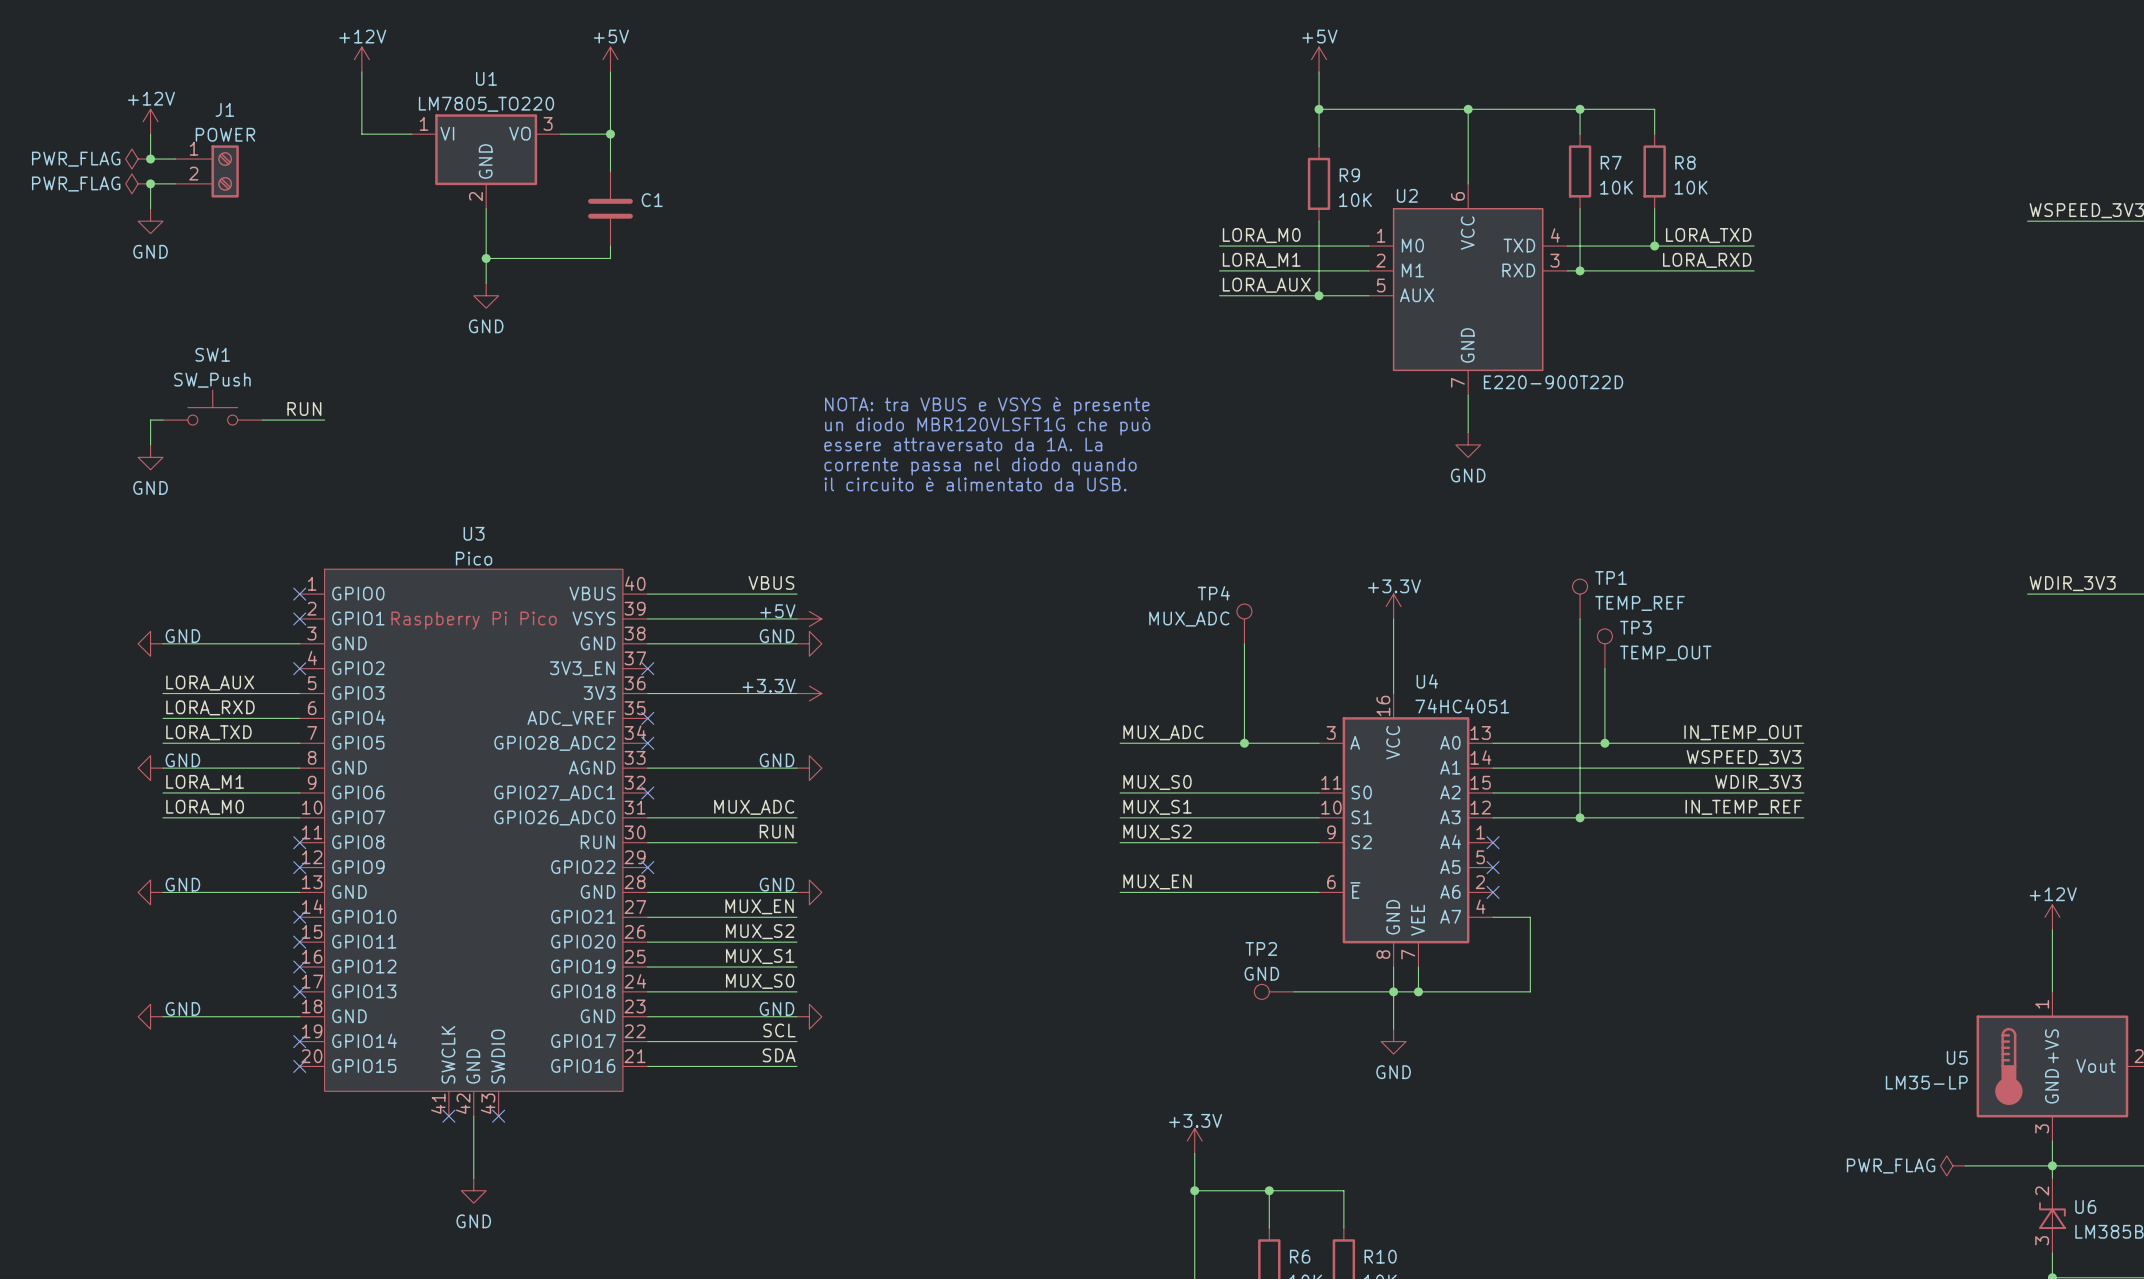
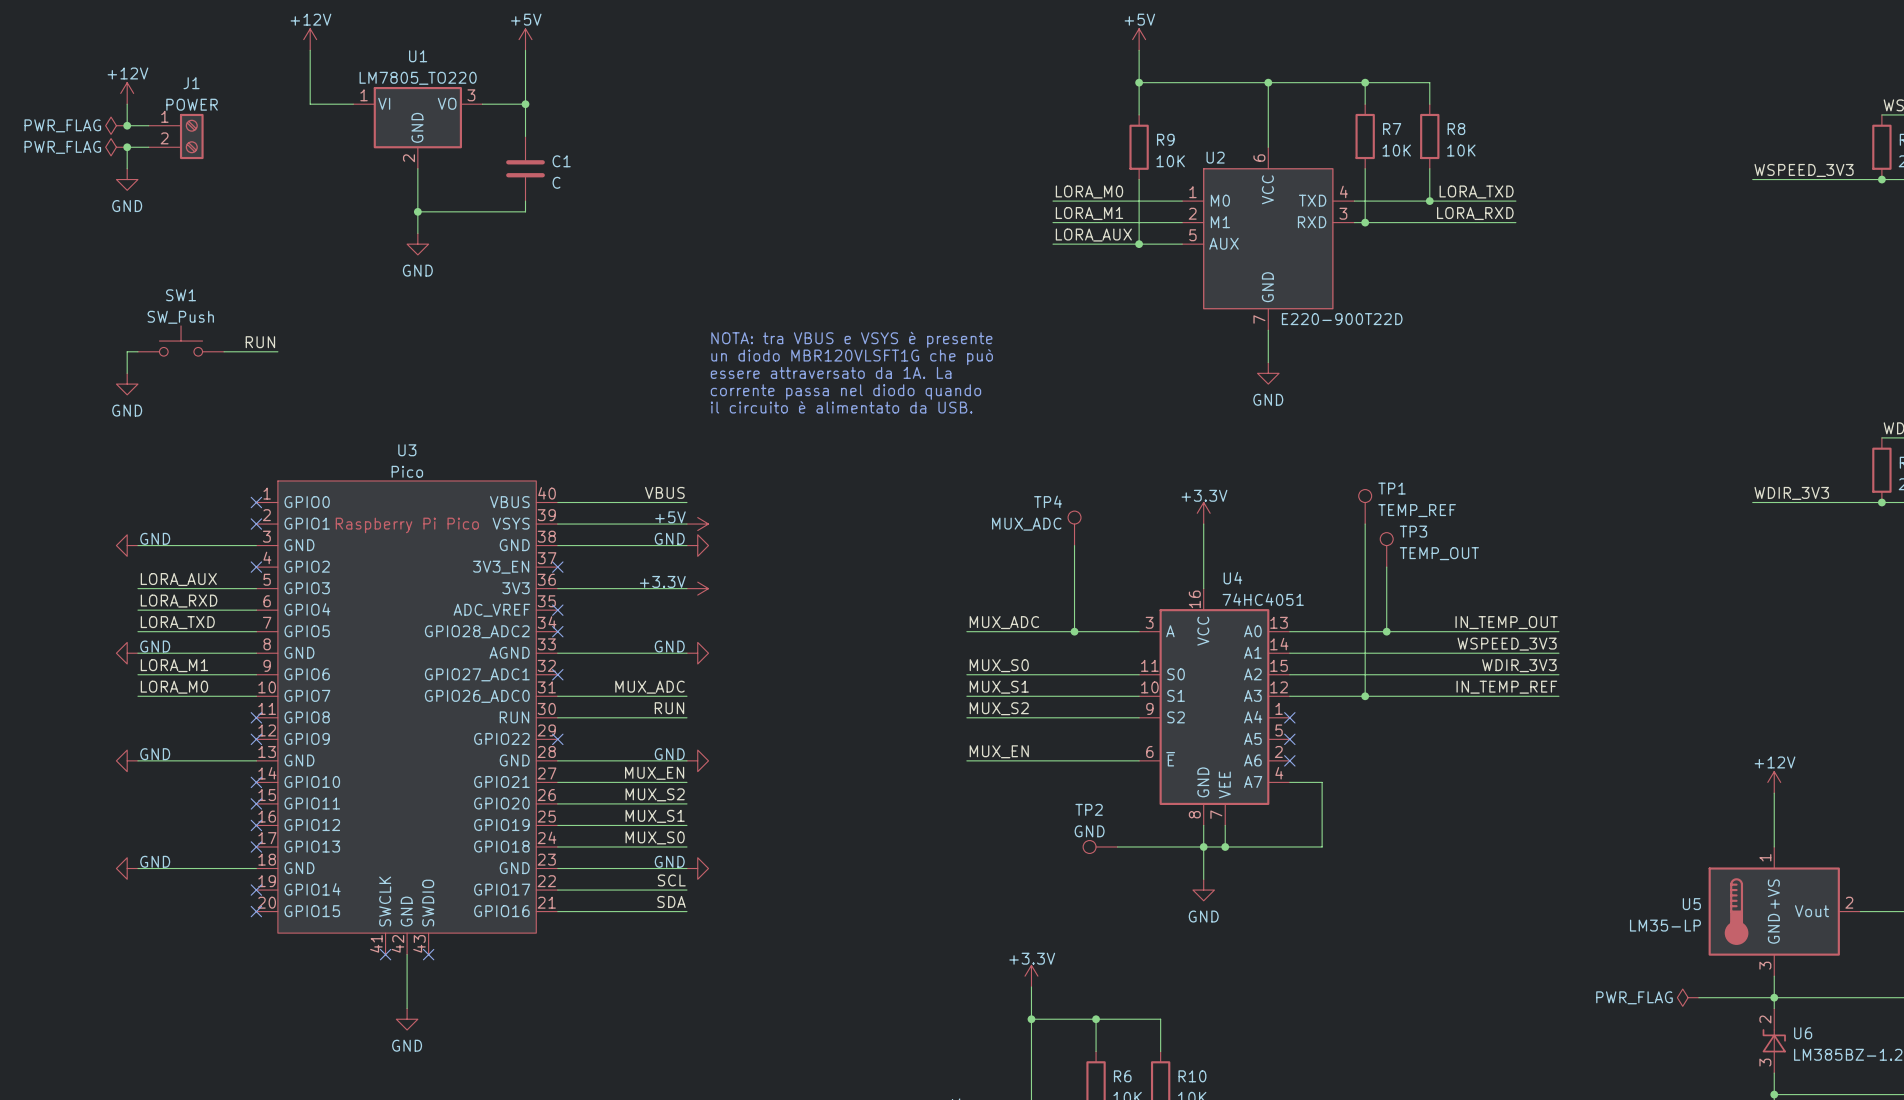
C1 value: none -> C (556, 182)

